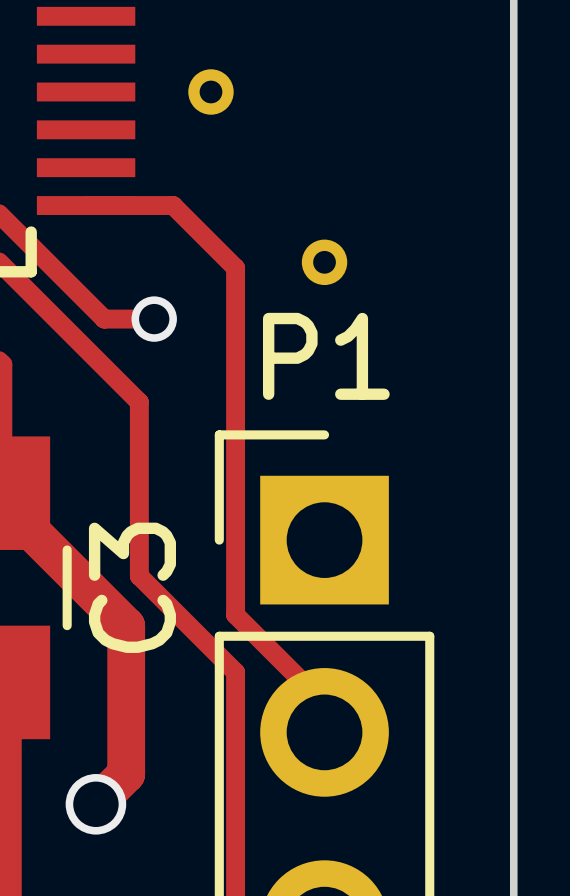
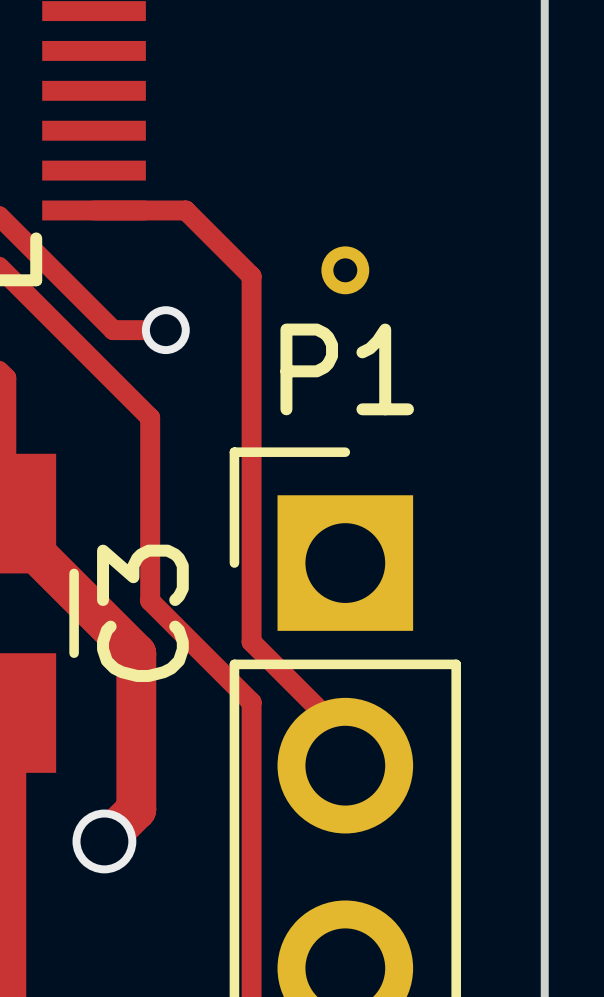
part: (210, 91) -> none

